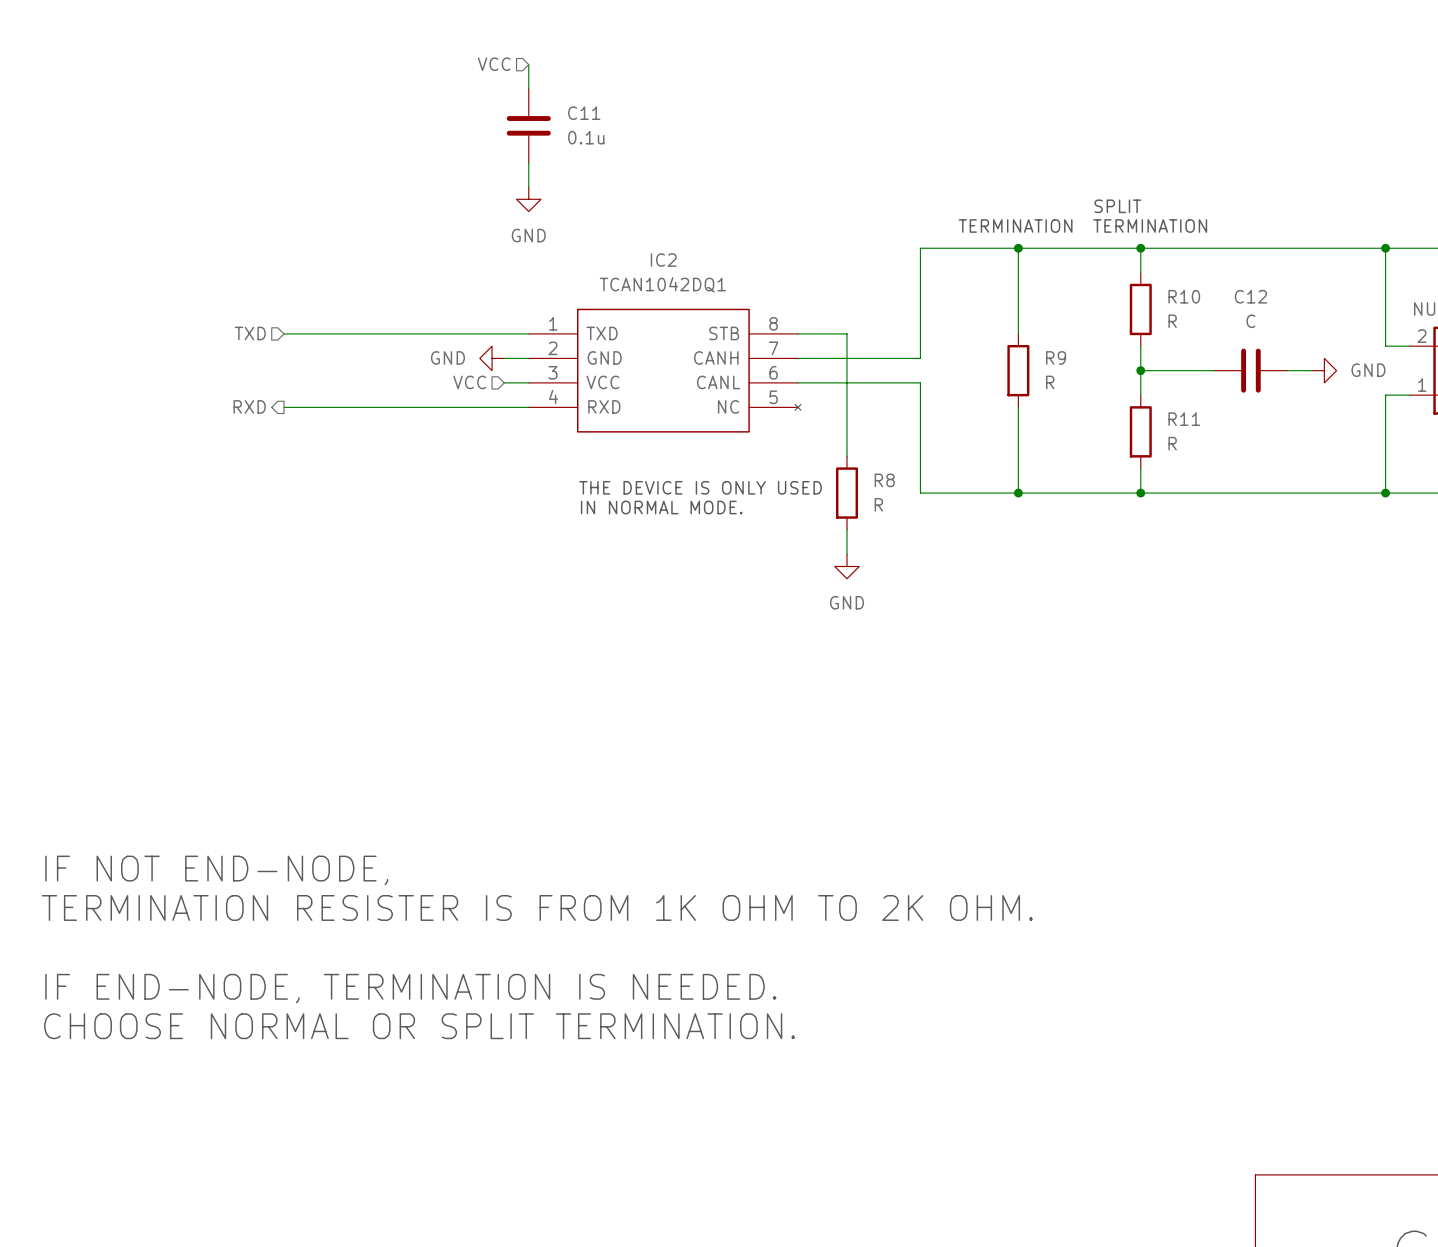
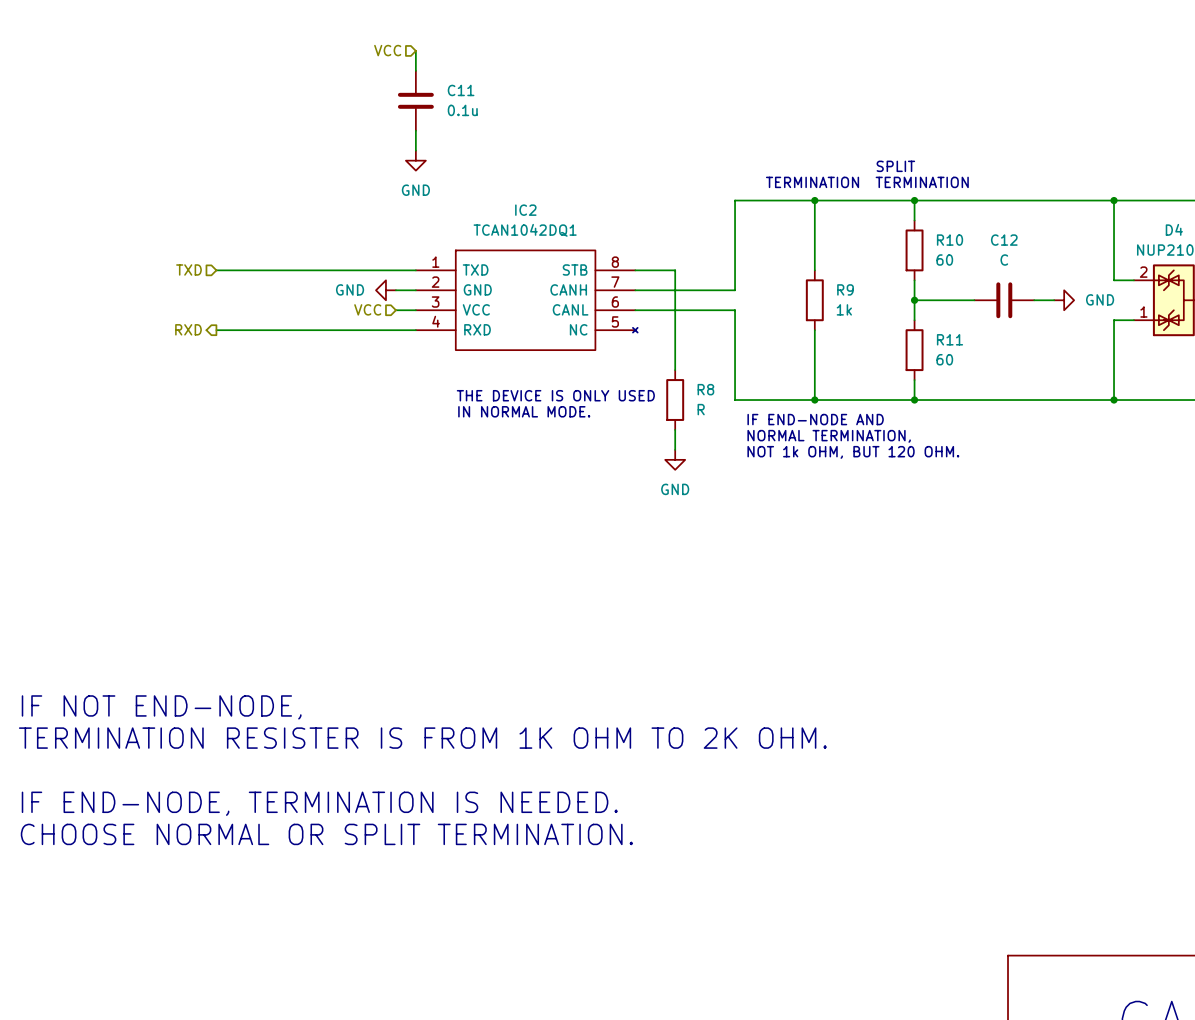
R10 value: R (1172, 321) -> 60 (944, 260)
R9 value: R (1050, 382) -> 1k (844, 309)
R11 value: R (1172, 443) -> 60 (944, 359)
text: none -> IF END-NODE AND (815, 419)
text: none -> NORMAL TERMINATION, (829, 436)
text: none -> NOT 1k OHM, BUT 120 OHM. (853, 452)

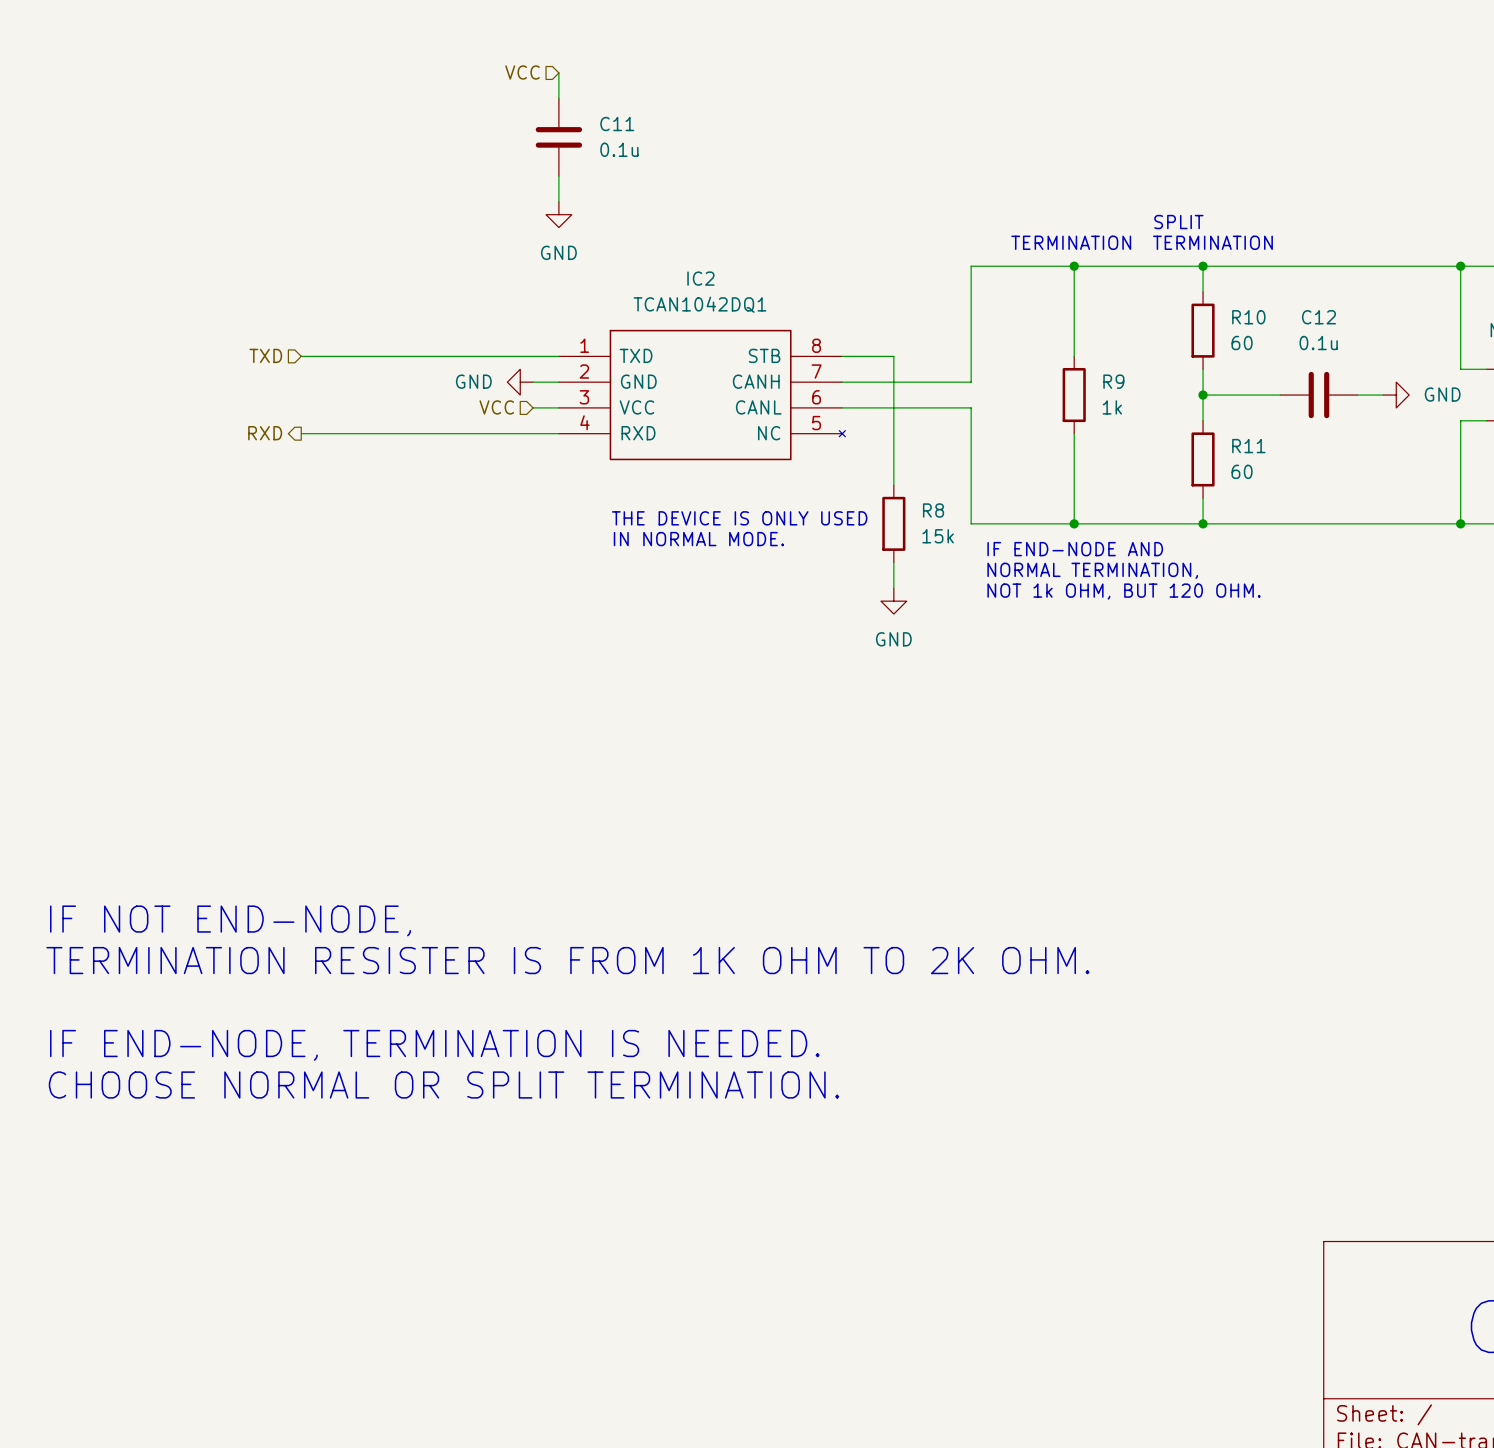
C12 value: C (1004, 260) -> 0.1u (1318, 343)
R8 value: R (701, 409) -> 15k (938, 536)

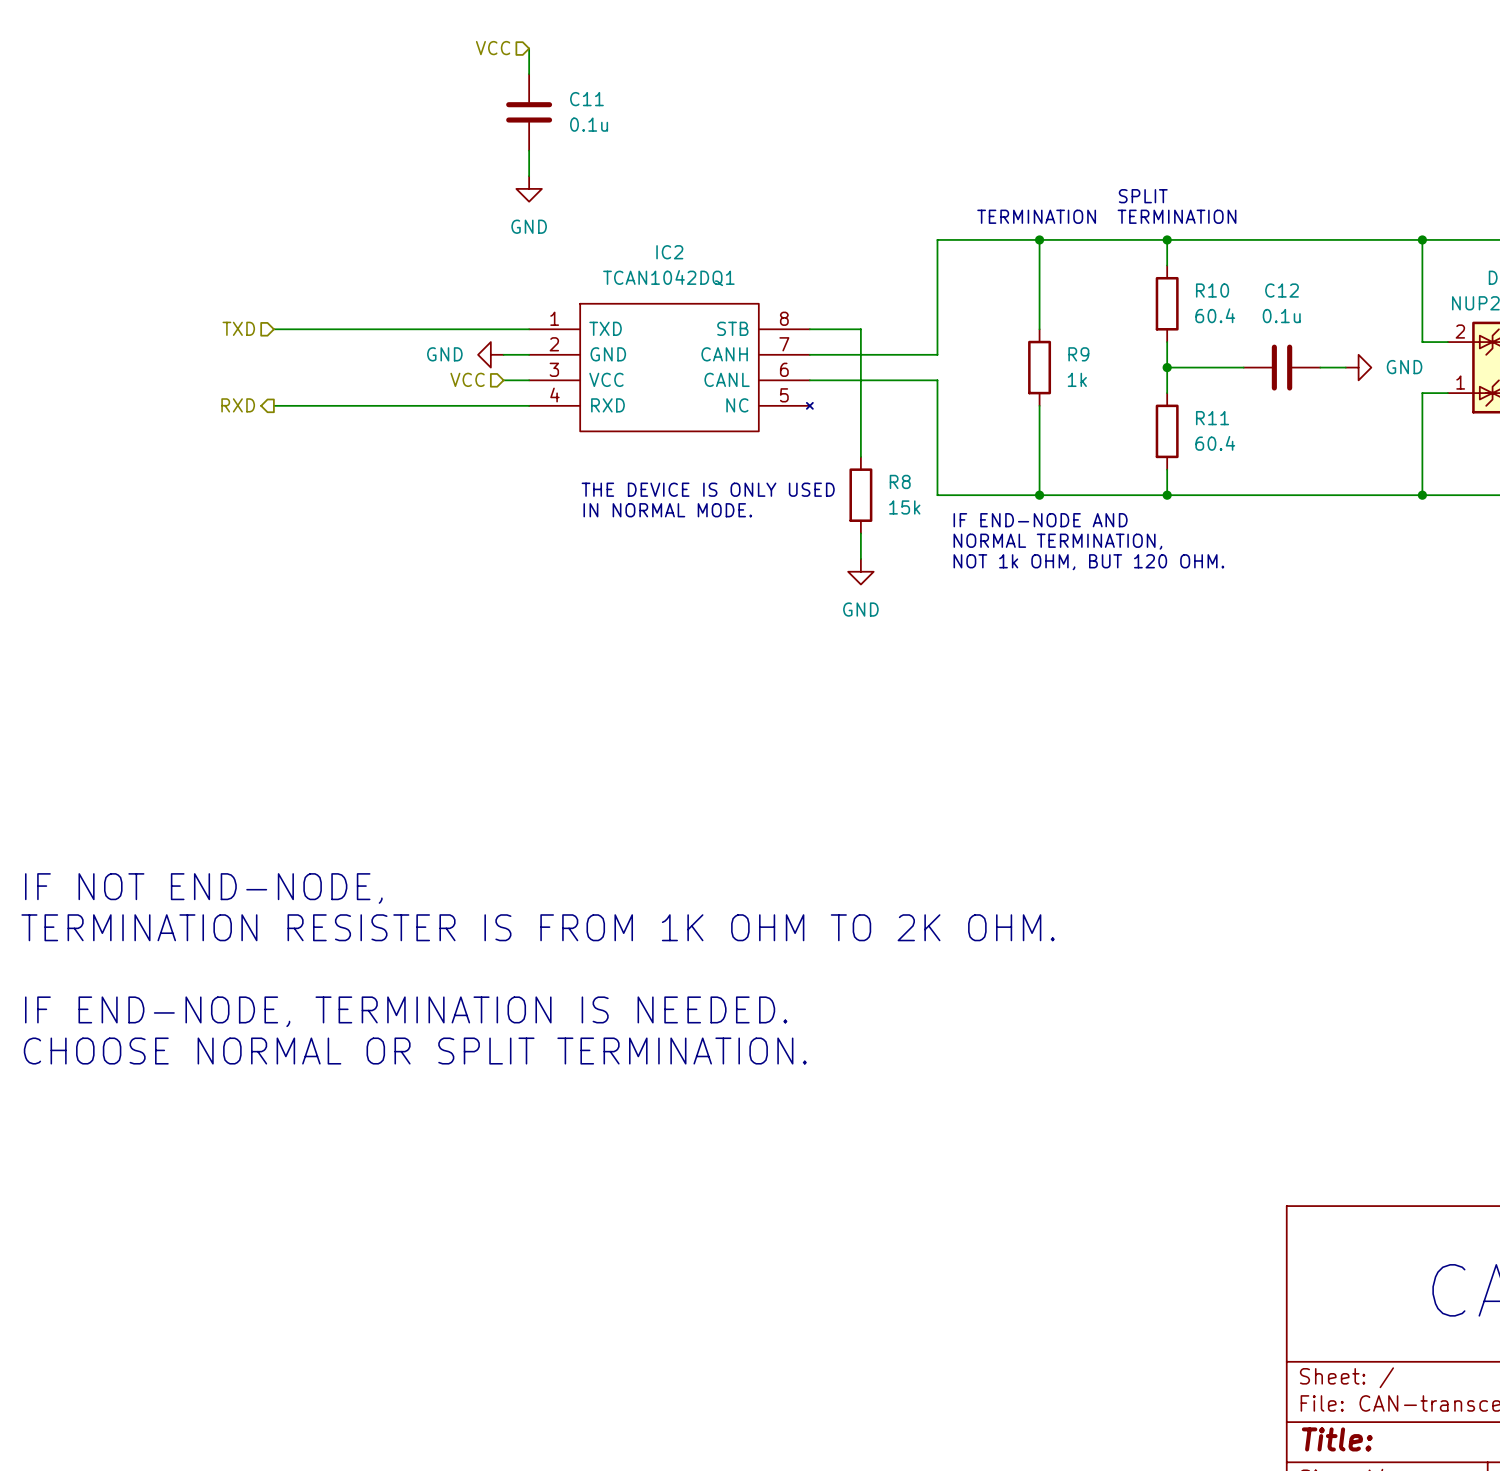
R10 value: 60 (1242, 343) -> 60.4 (1215, 315)
R11 value: 60 (1242, 471) -> 60.4 (1215, 443)

